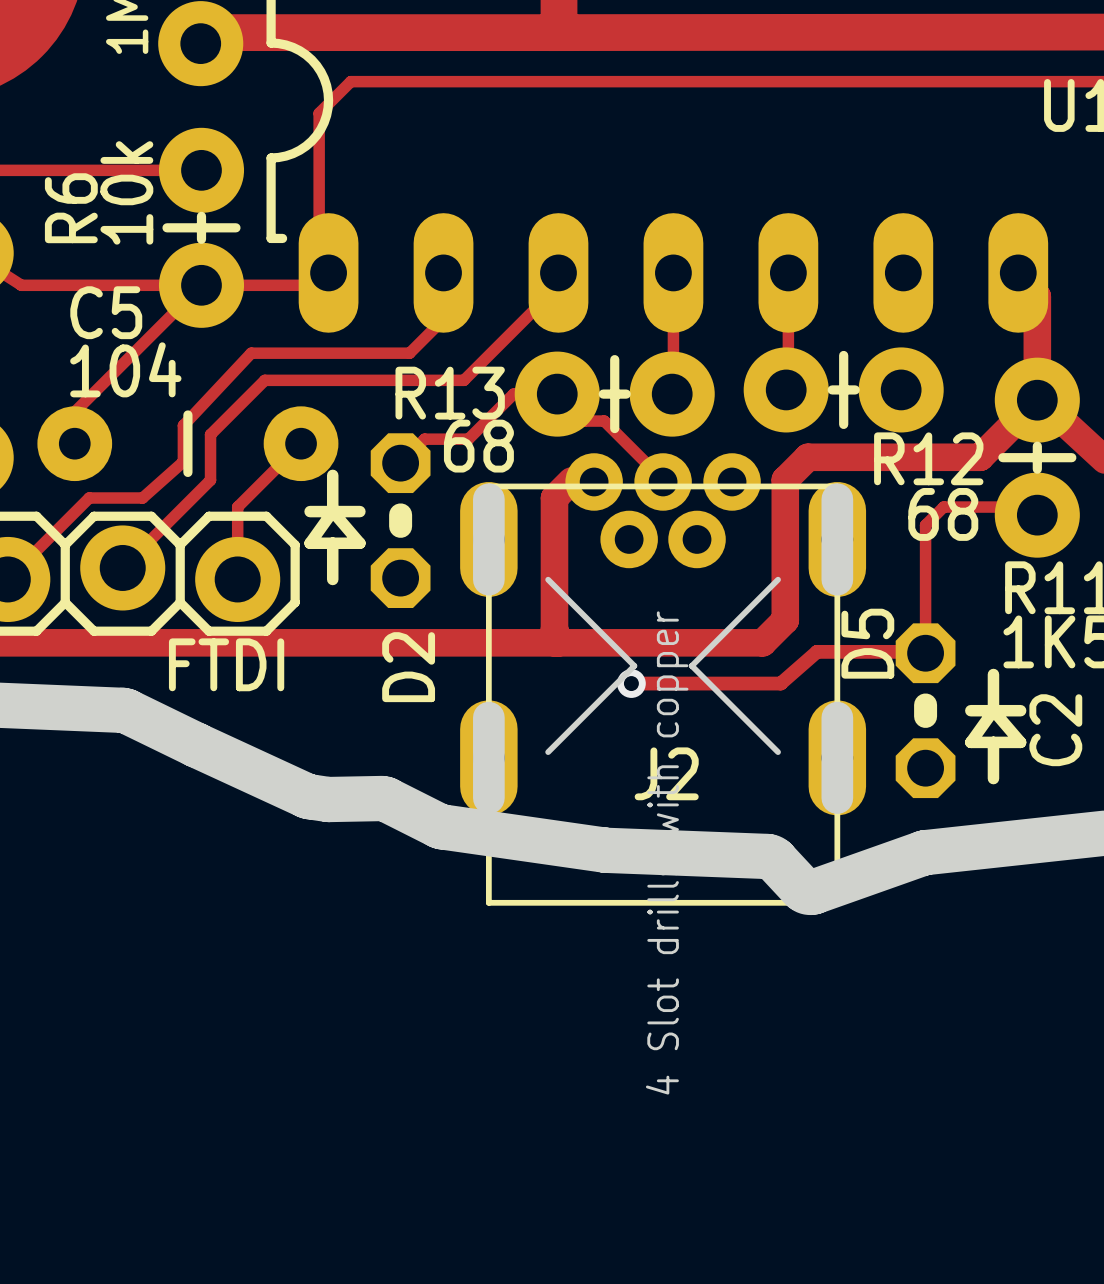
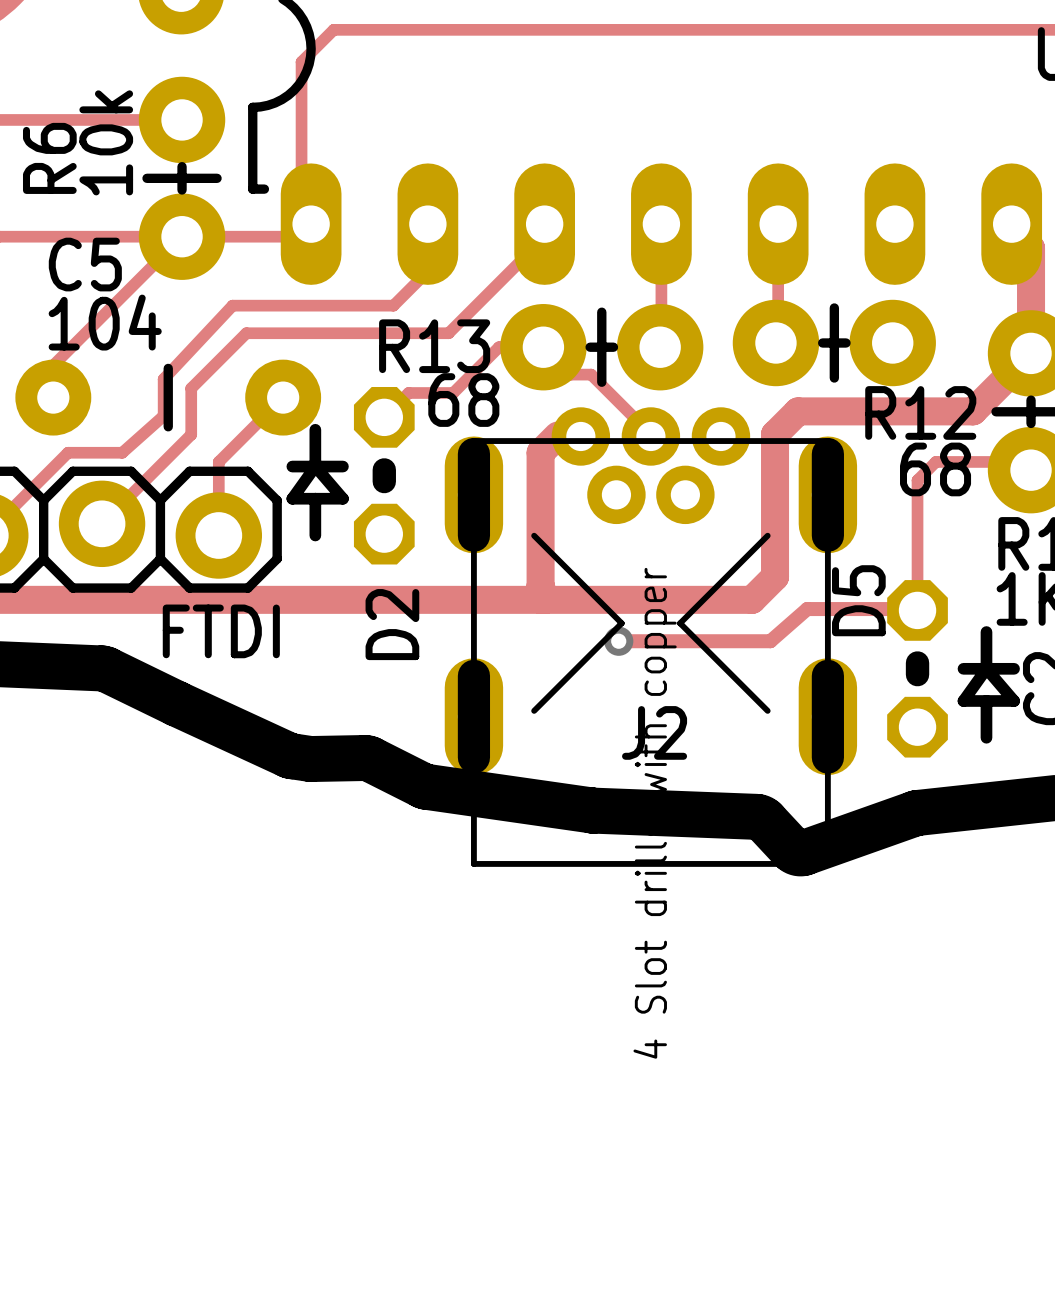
FTDI name position: FTDI (226, 664) -> FTDI (221, 631)

